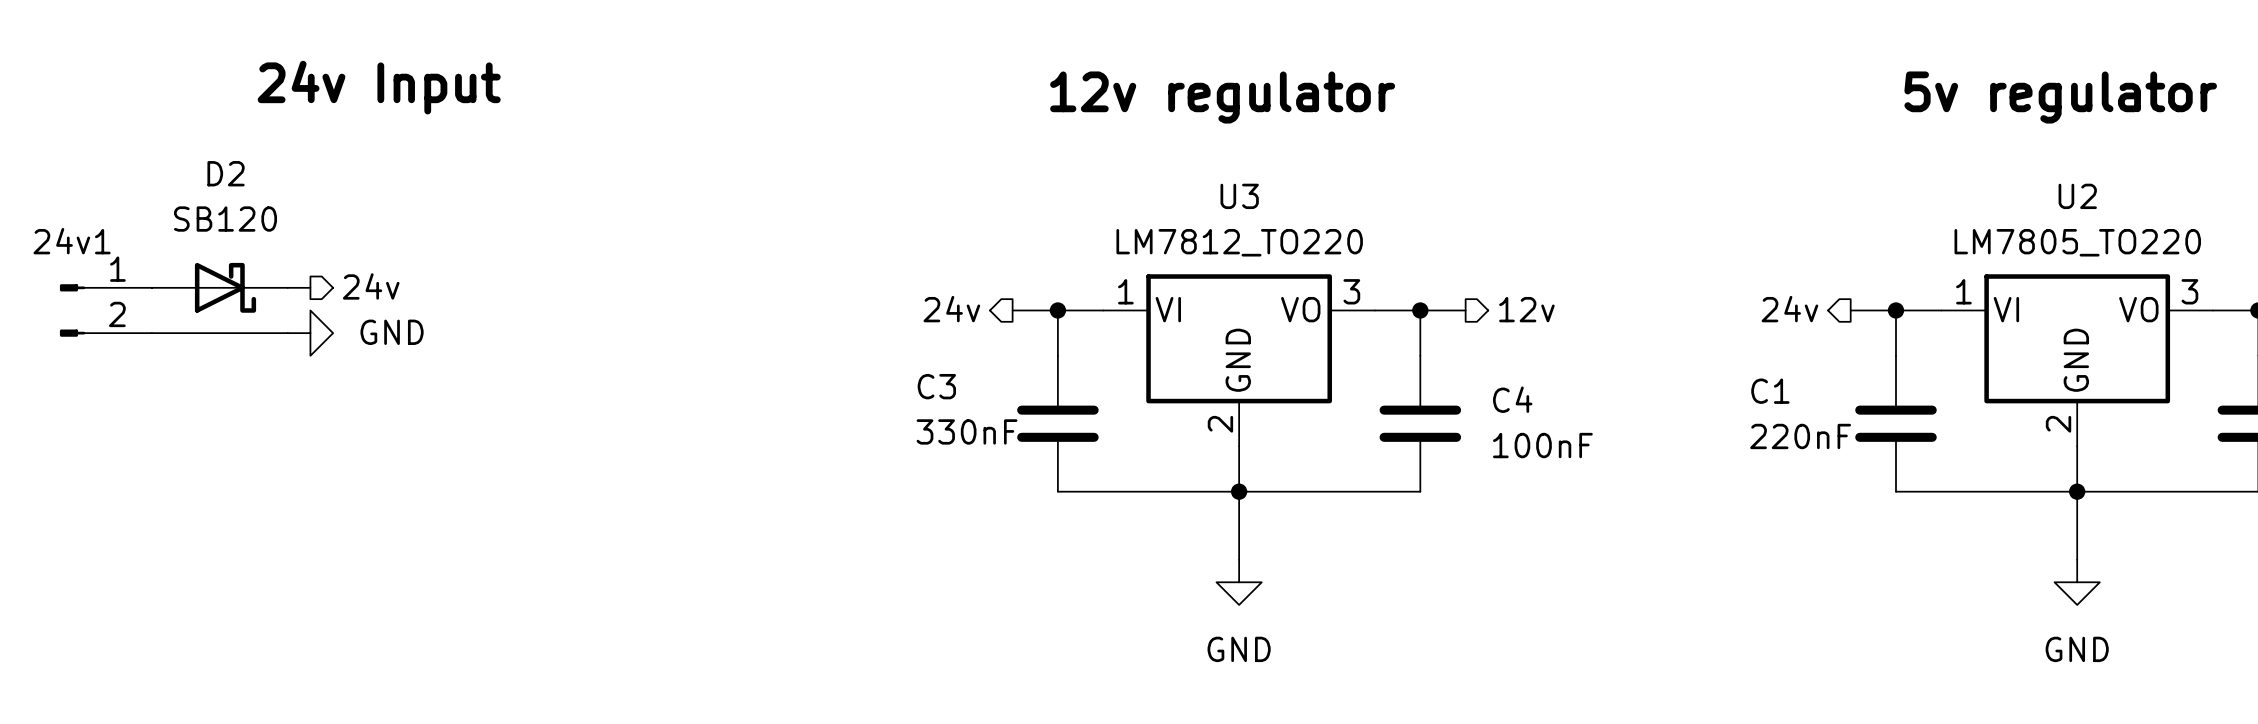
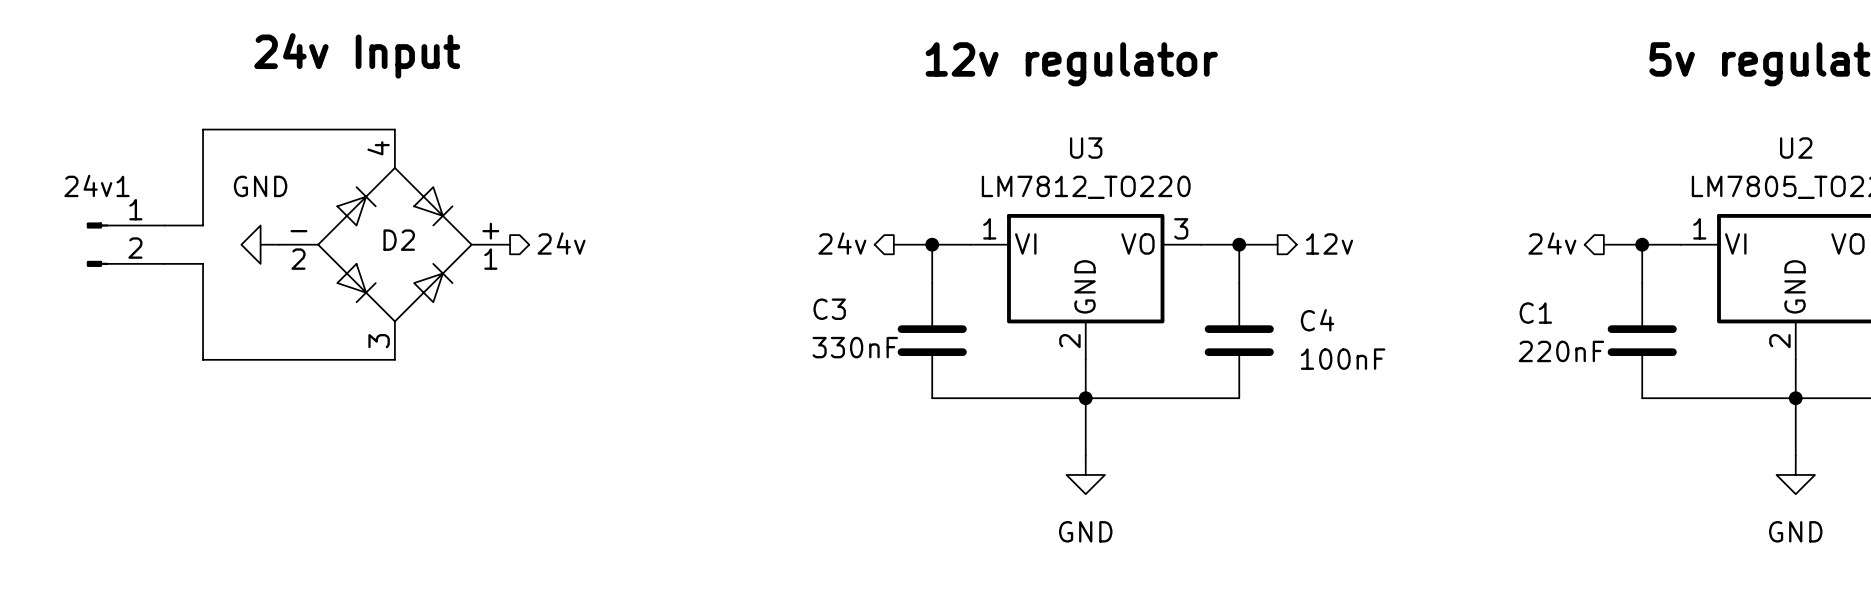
D2 name position: D2 (226, 173) -> D2 (399, 240)
wire: none -> (394, 129) (203, 129) (203, 225) (164, 225)
D2 value: SB120 (225, 219) -> none
D2 symbol: [151, 262, 288, 313] -> [279, 129, 511, 360]
hierarchical label position: 24v (371, 286) -> 24v (561, 243)
wire: (287, 287) (310, 287) -> none
power symbol text position: GND (392, 332) -> GND (260, 186)
wire: (197, 333) (287, 333) -> (203, 263) (203, 359) (394, 359)
power symbol rotation: 0° (310, 333) -> 180° (260, 244)
power symbol position: GND (310, 333) -> GND (260, 244)

